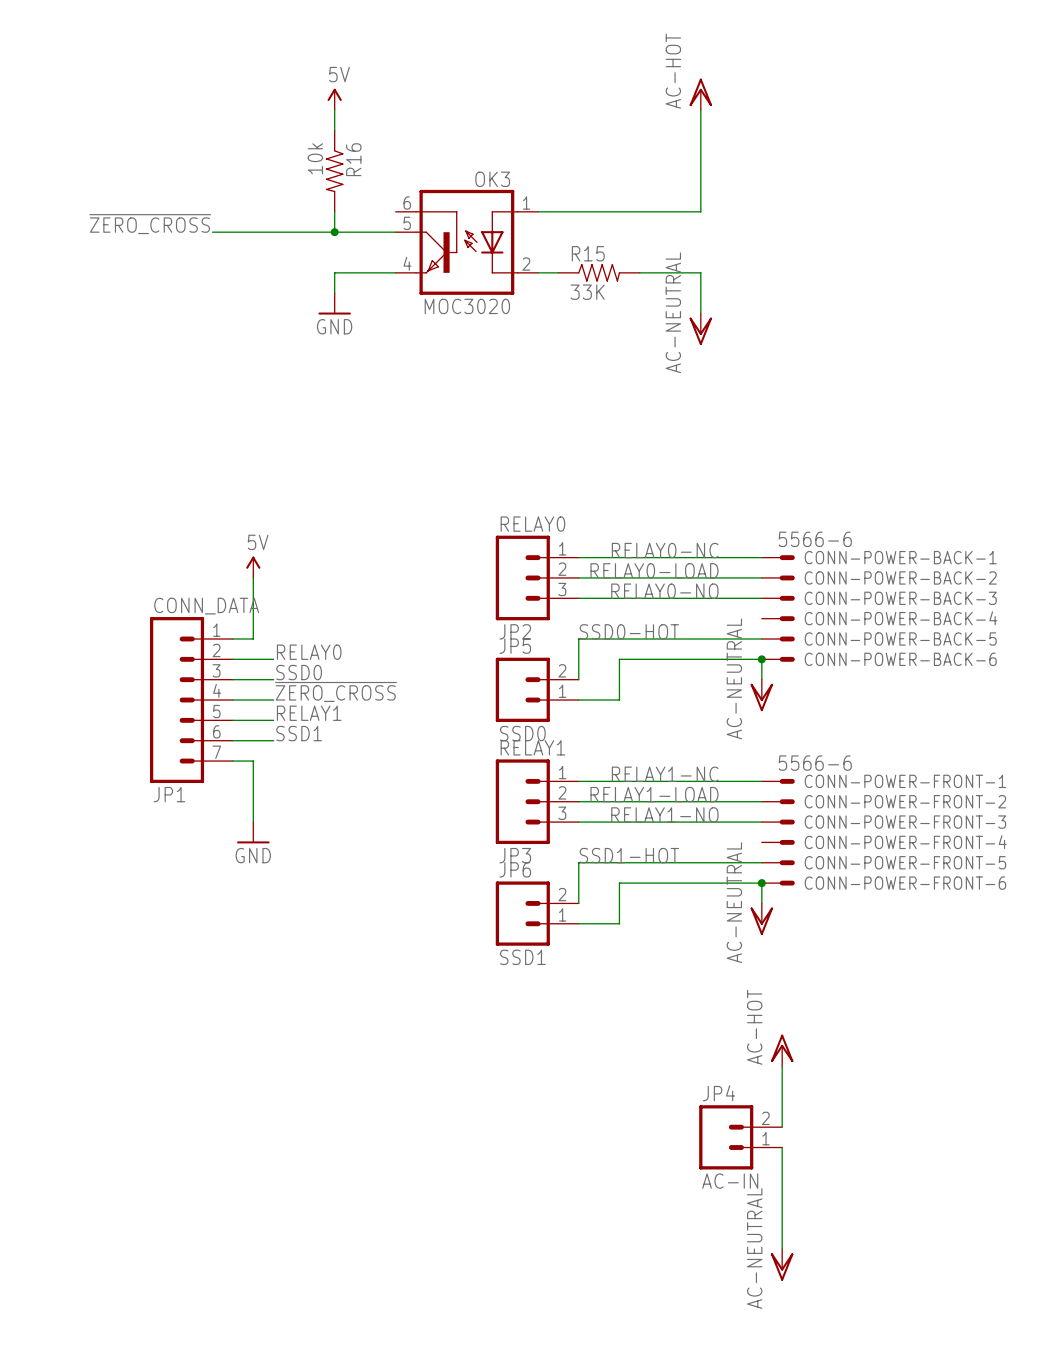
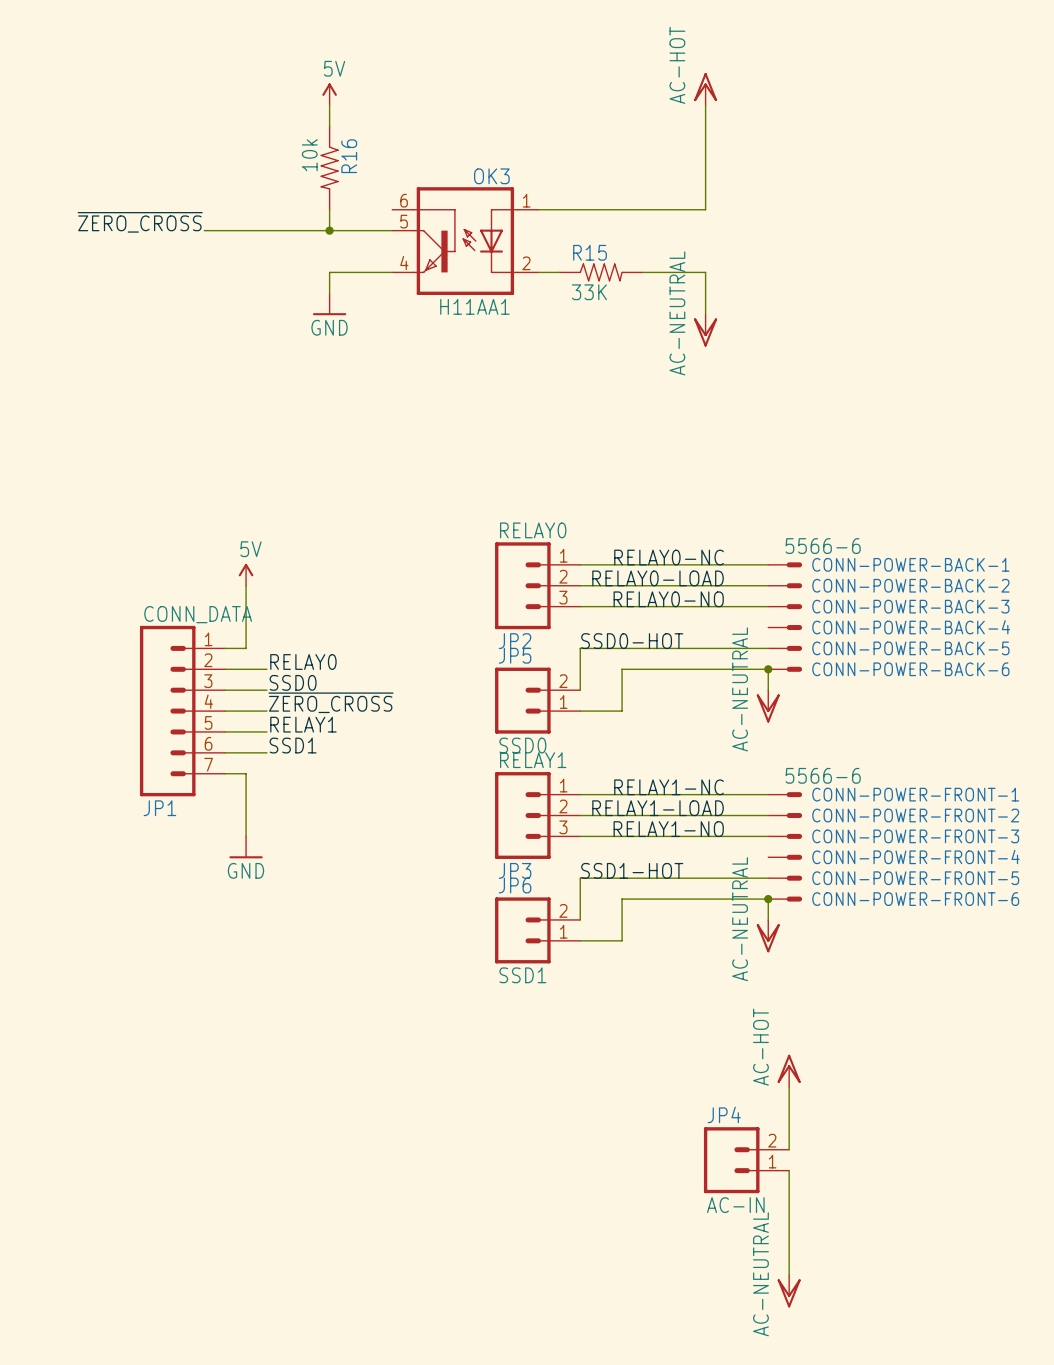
OK3 value: MOC3020 (467, 306) -> H11AA1 (474, 306)

